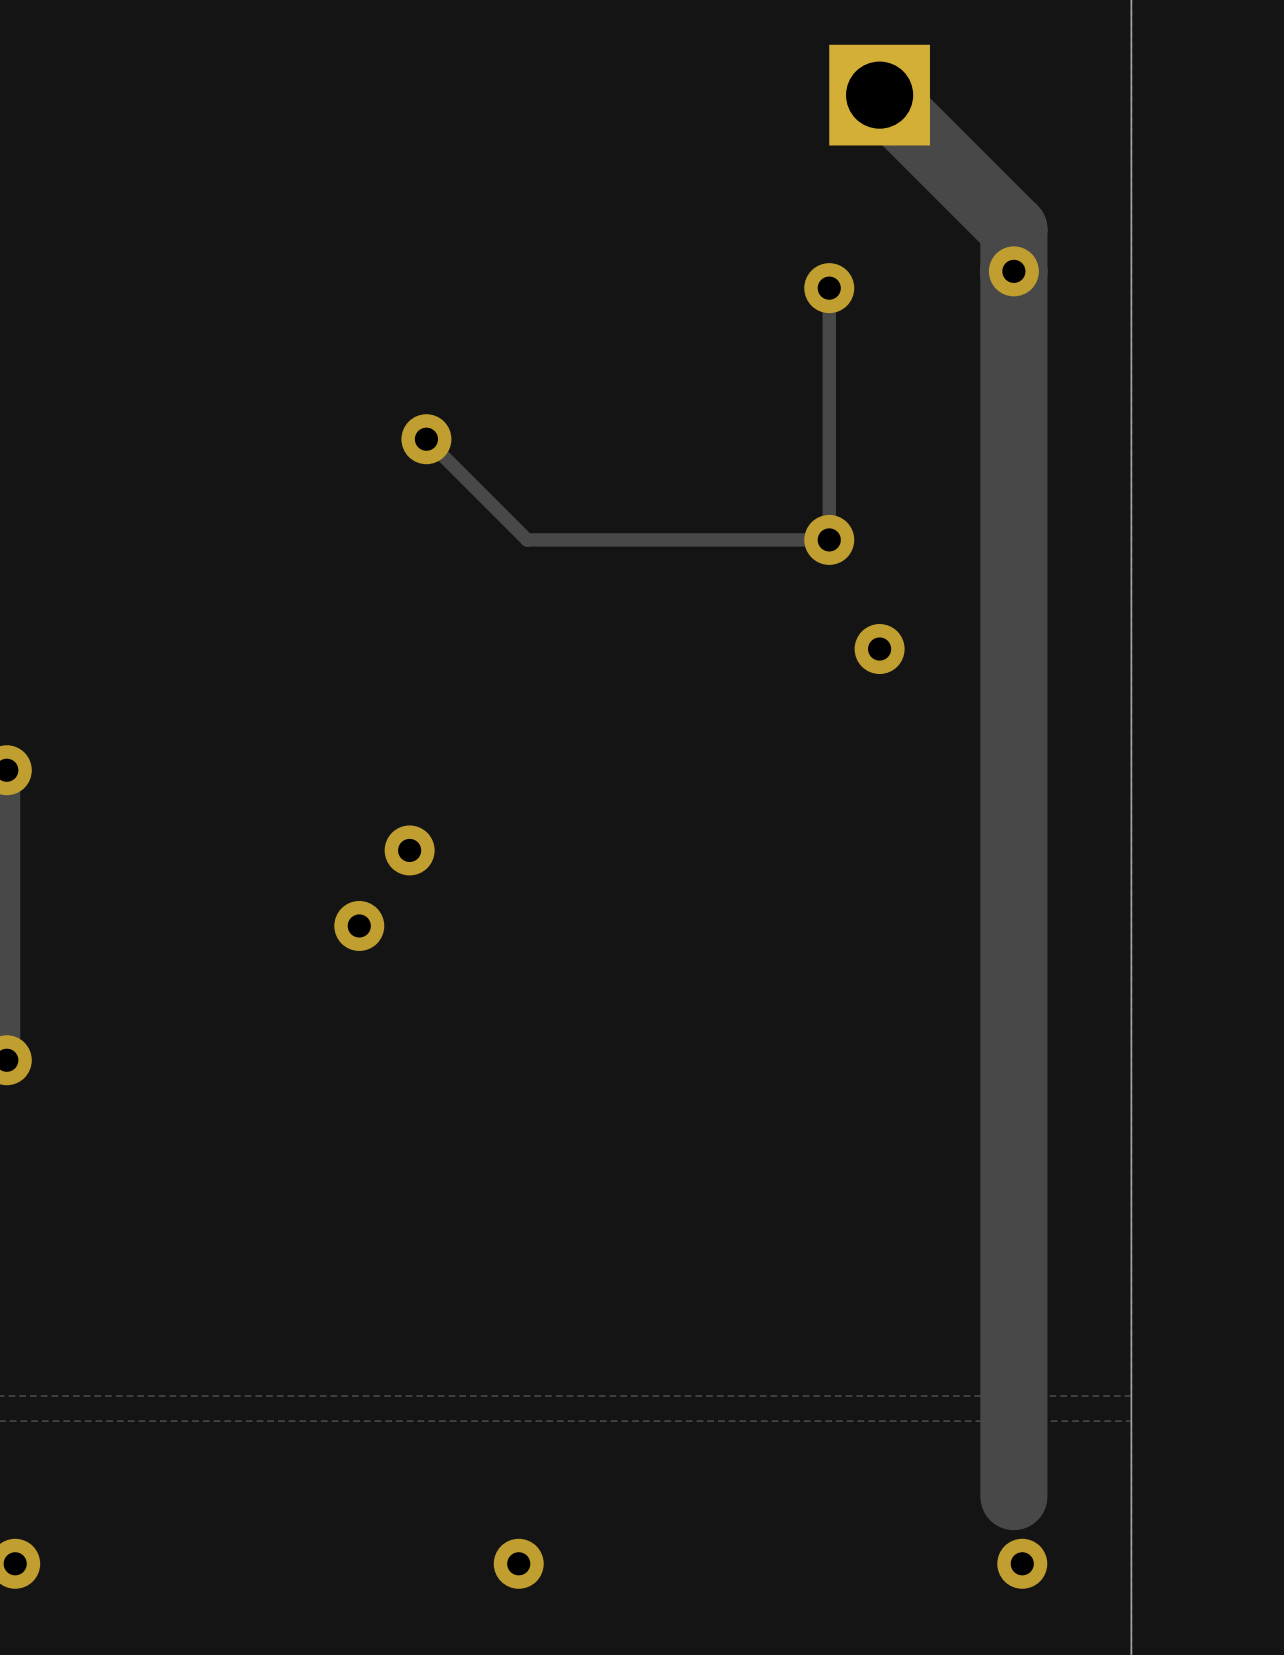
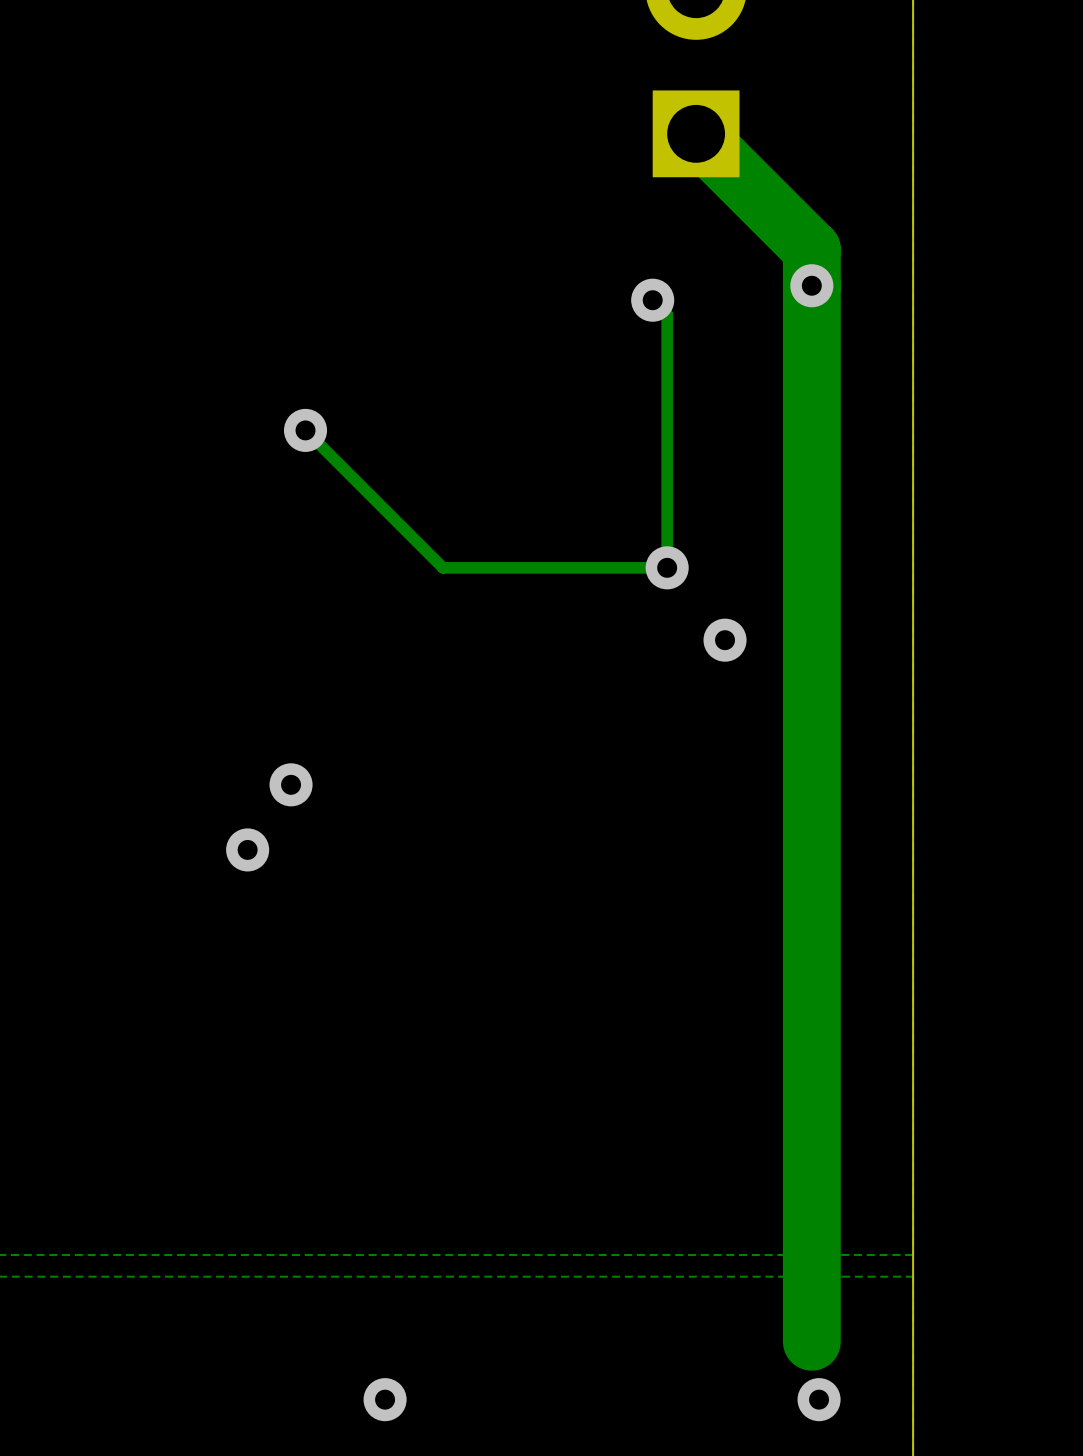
track: (829, 288) (829, 539) (527, 539) -> (652, 300) (667, 314) (667, 567) (442, 567) (392, 517)
via: (829, 539) -> none
via: none -> (667, 567)
via position: (879, 649) -> (725, 640)

